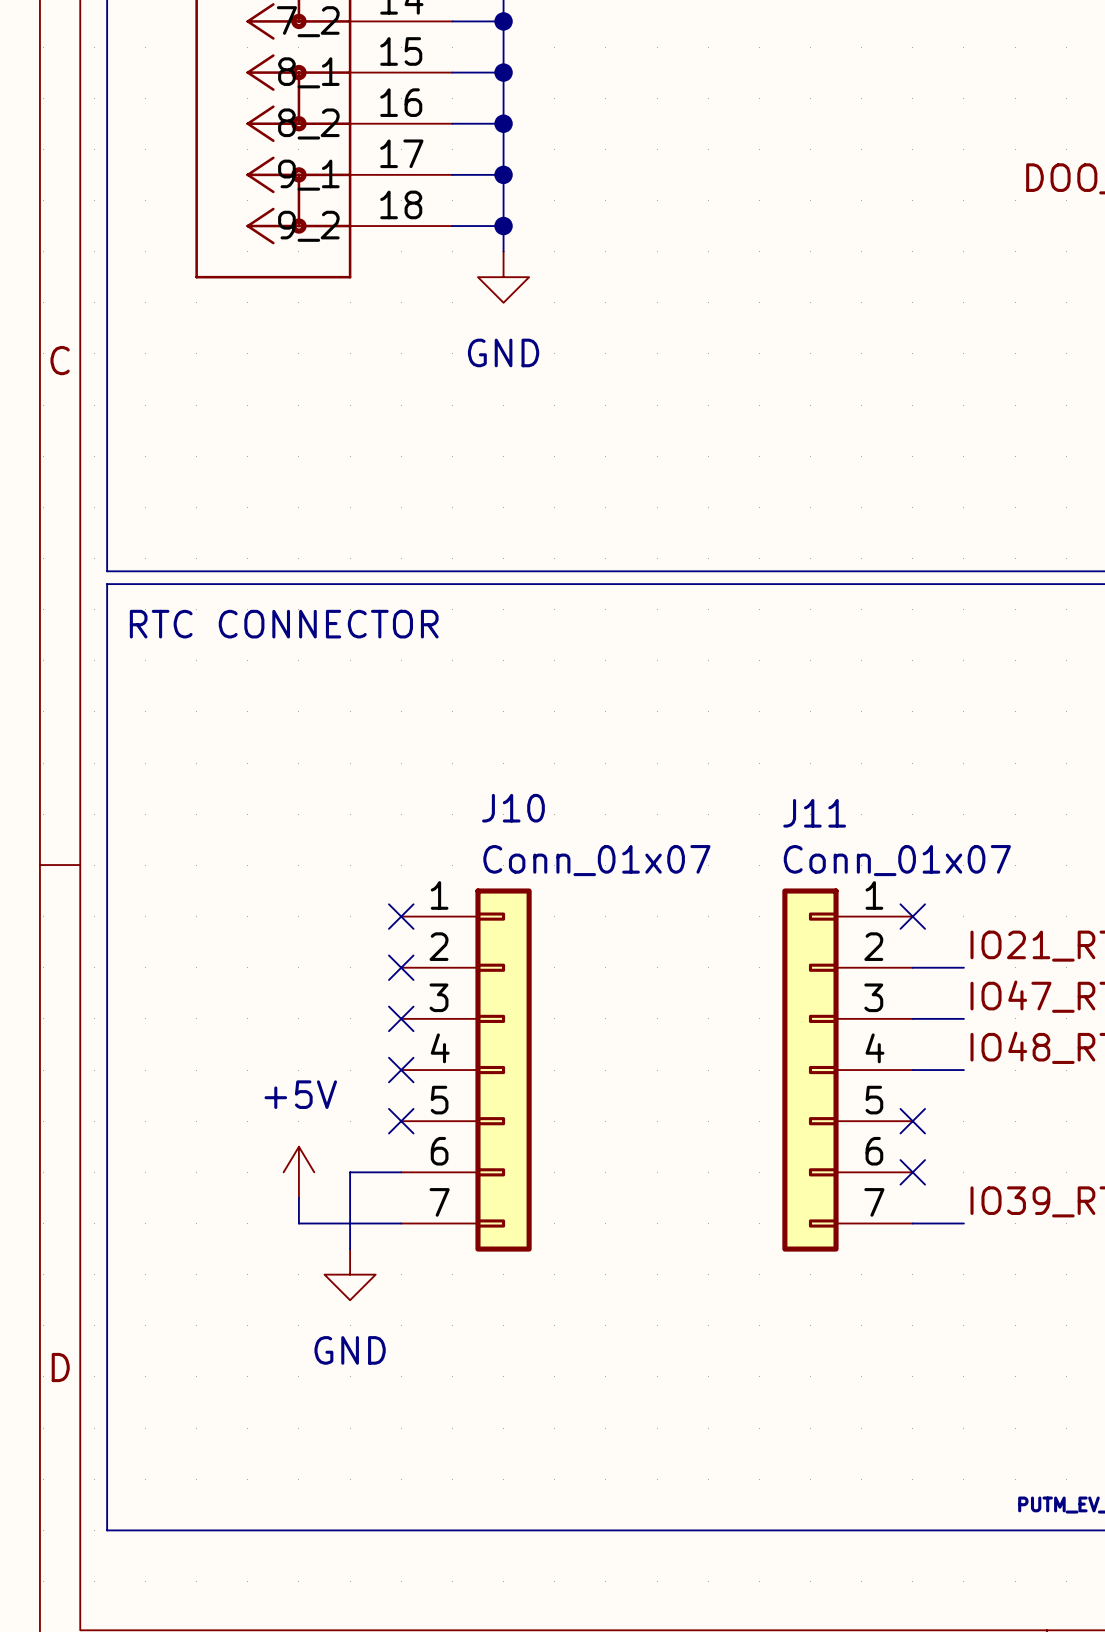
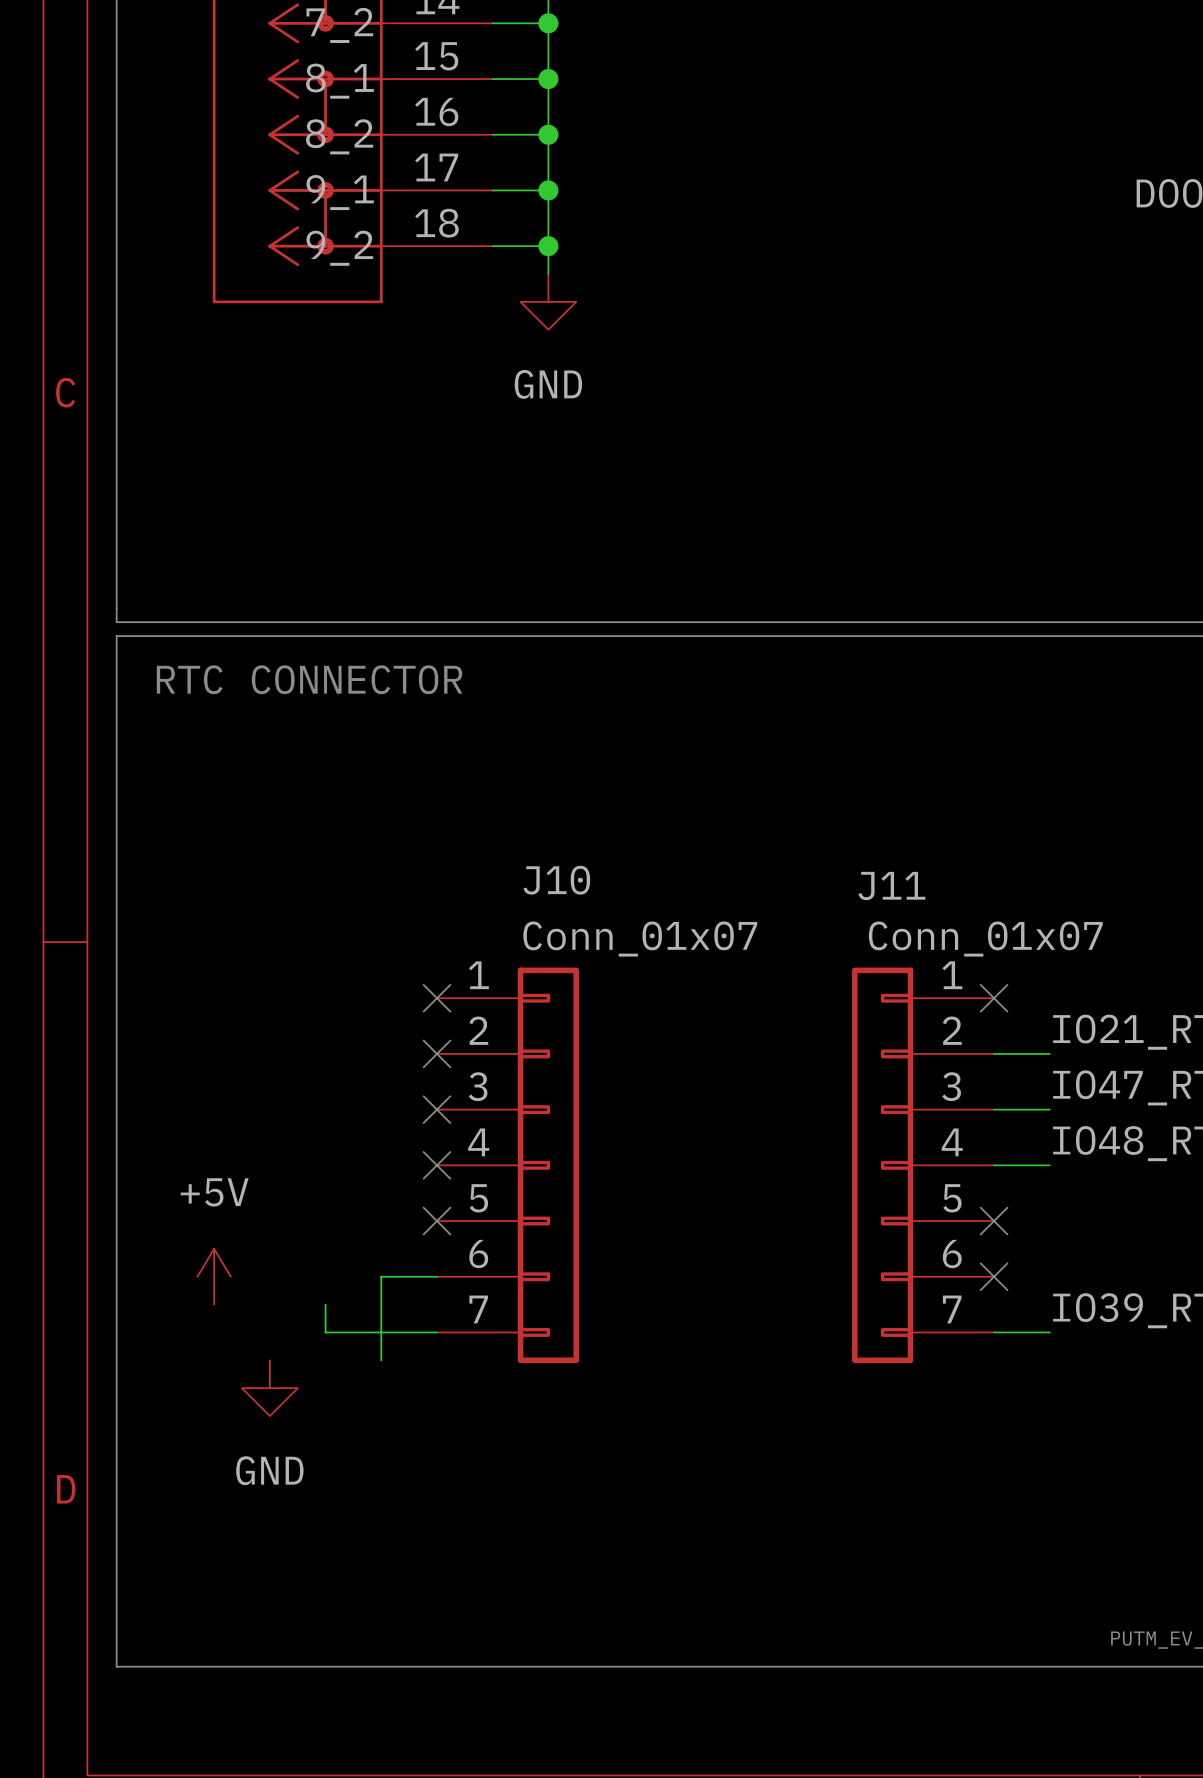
power symbol position: +5V (298, 1172) -> +5V (214, 1276)
power symbol position: GND (350, 1274) -> GND (269, 1388)

